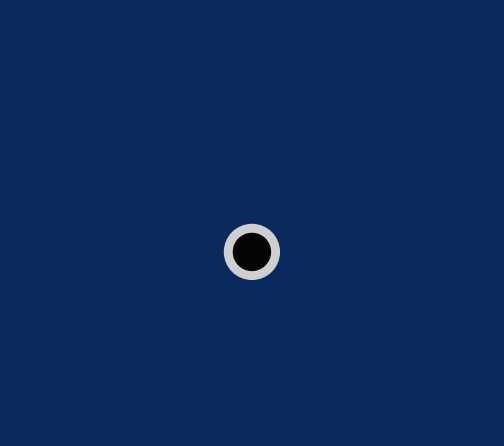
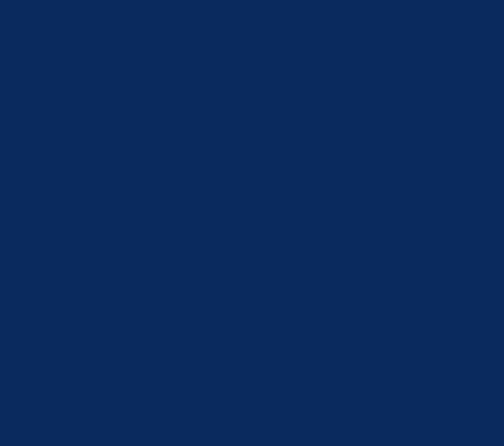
part: (251, 251) -> none

